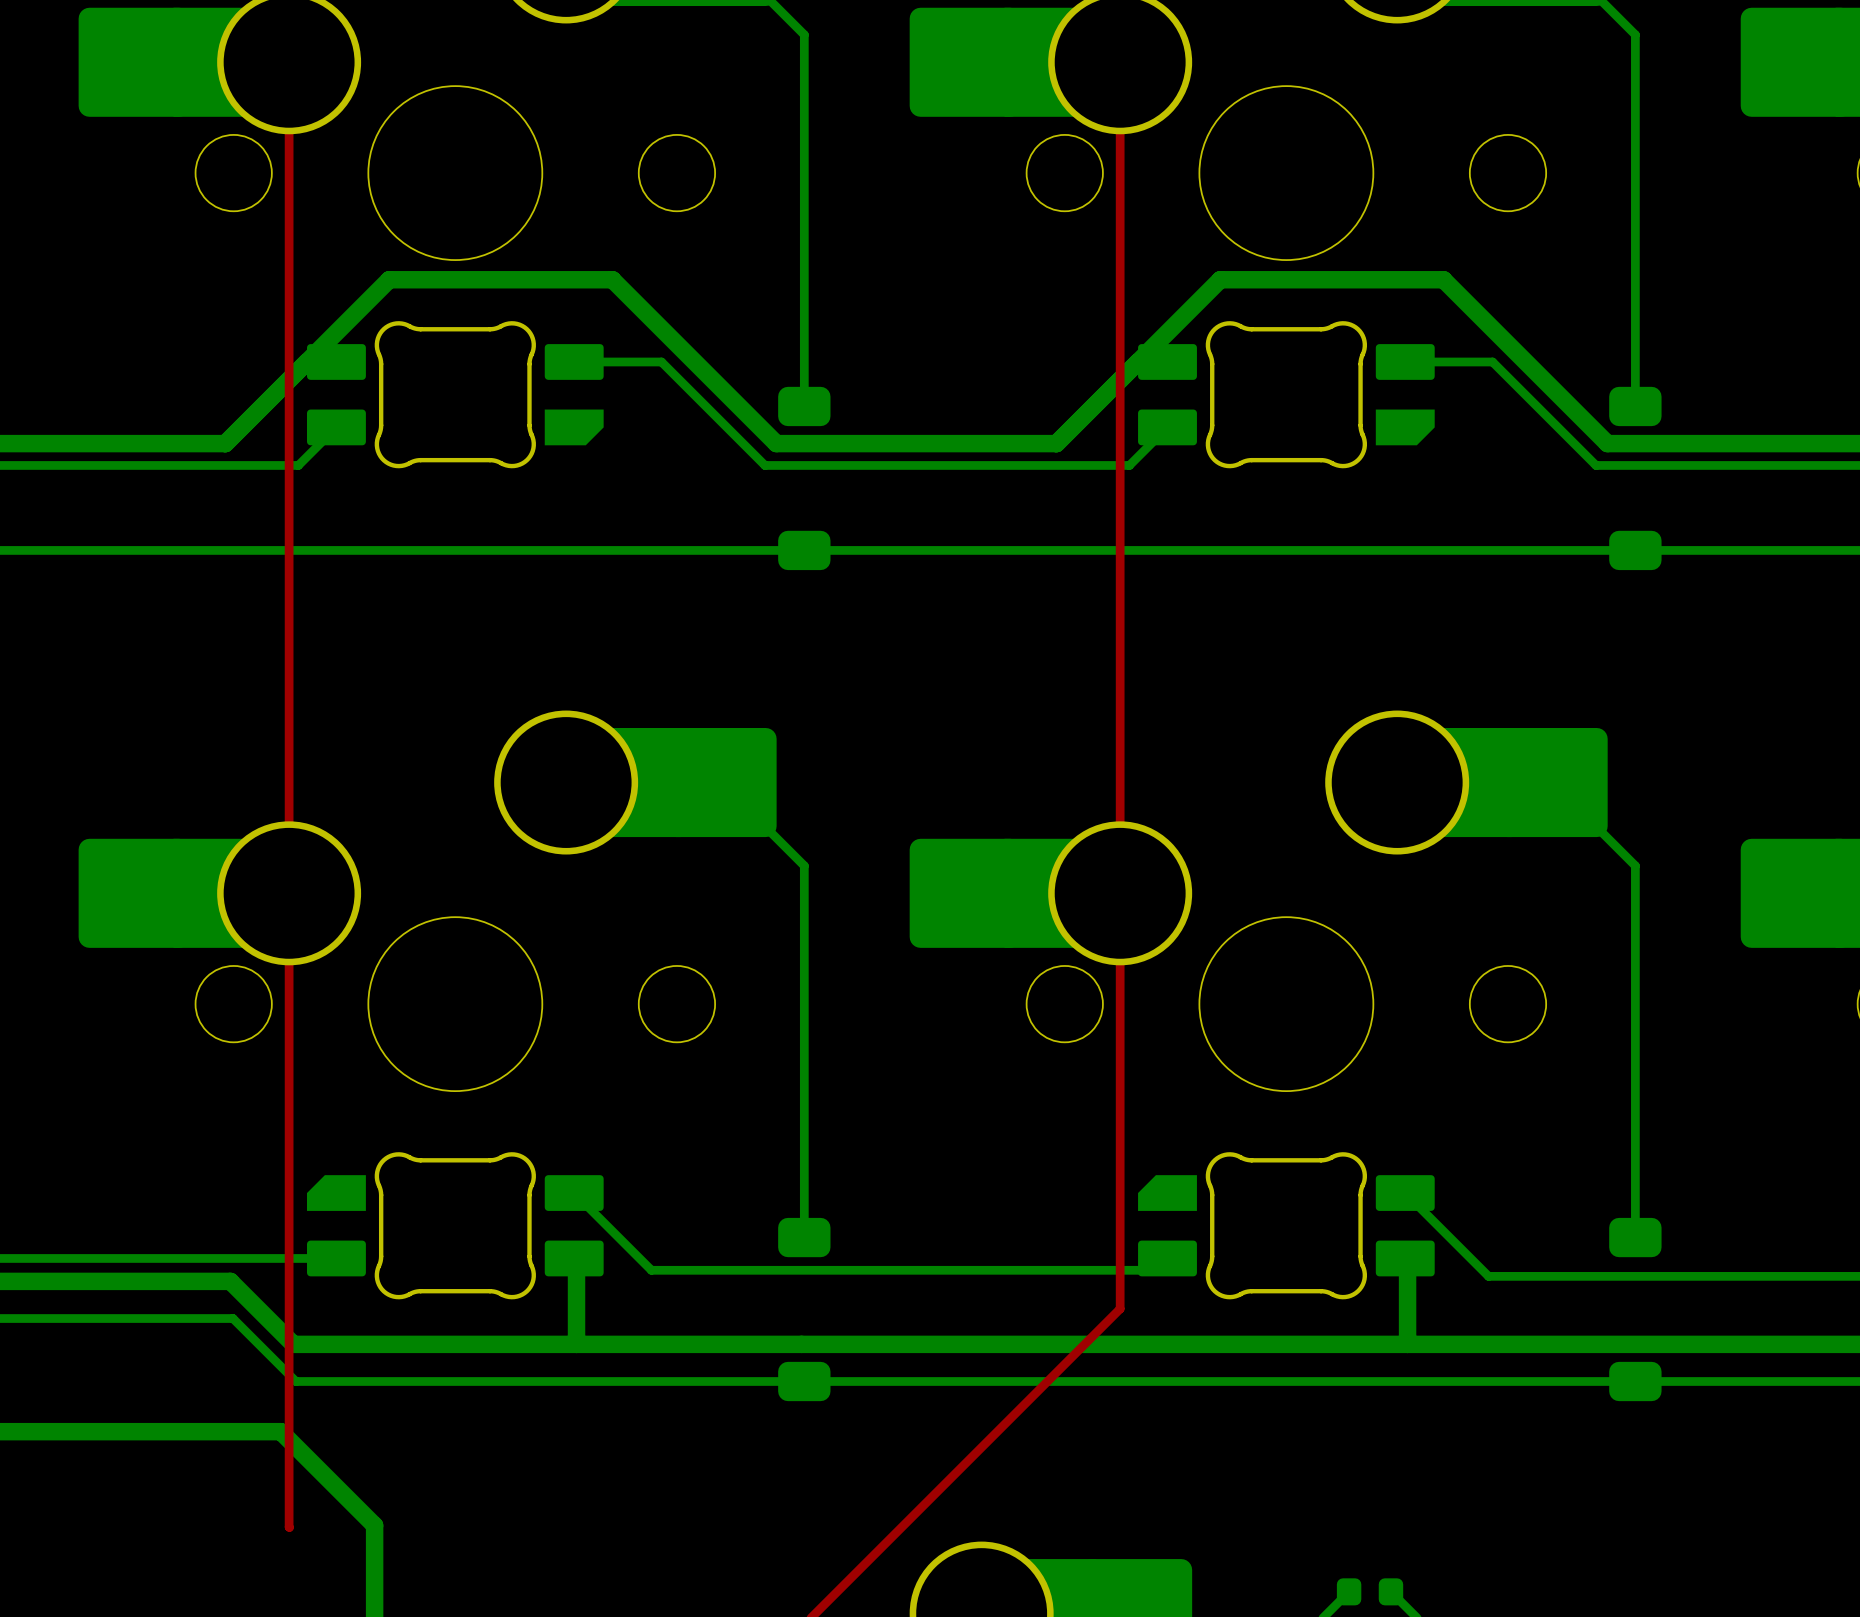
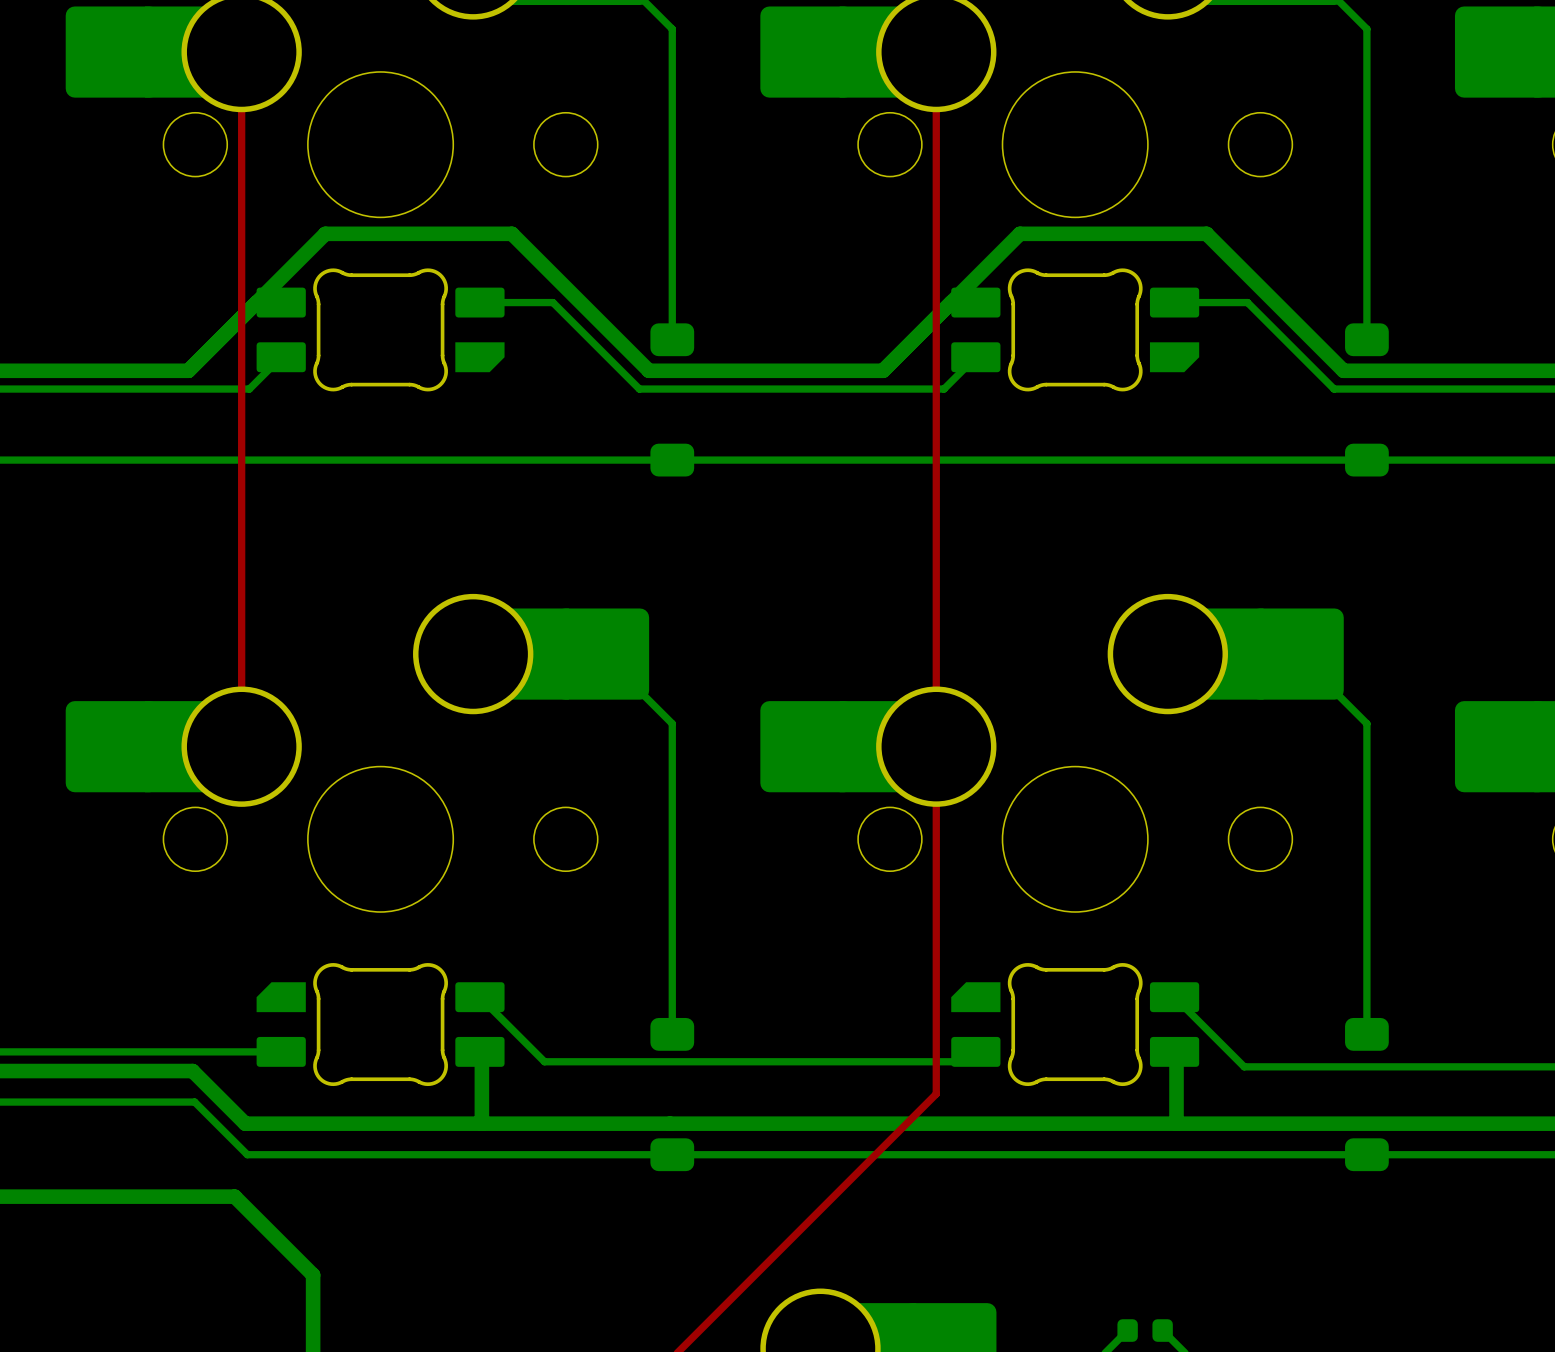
top track: (289, 893) (289, 1527) -> none

